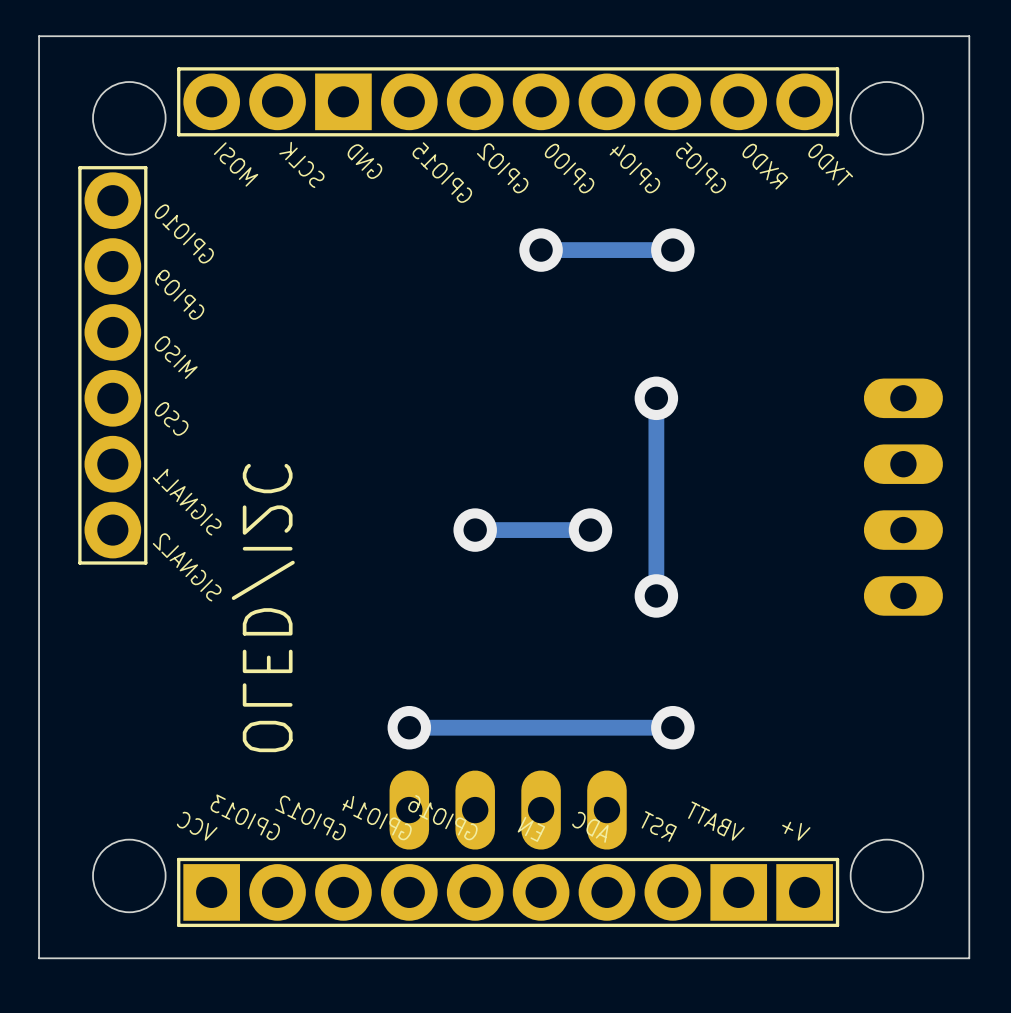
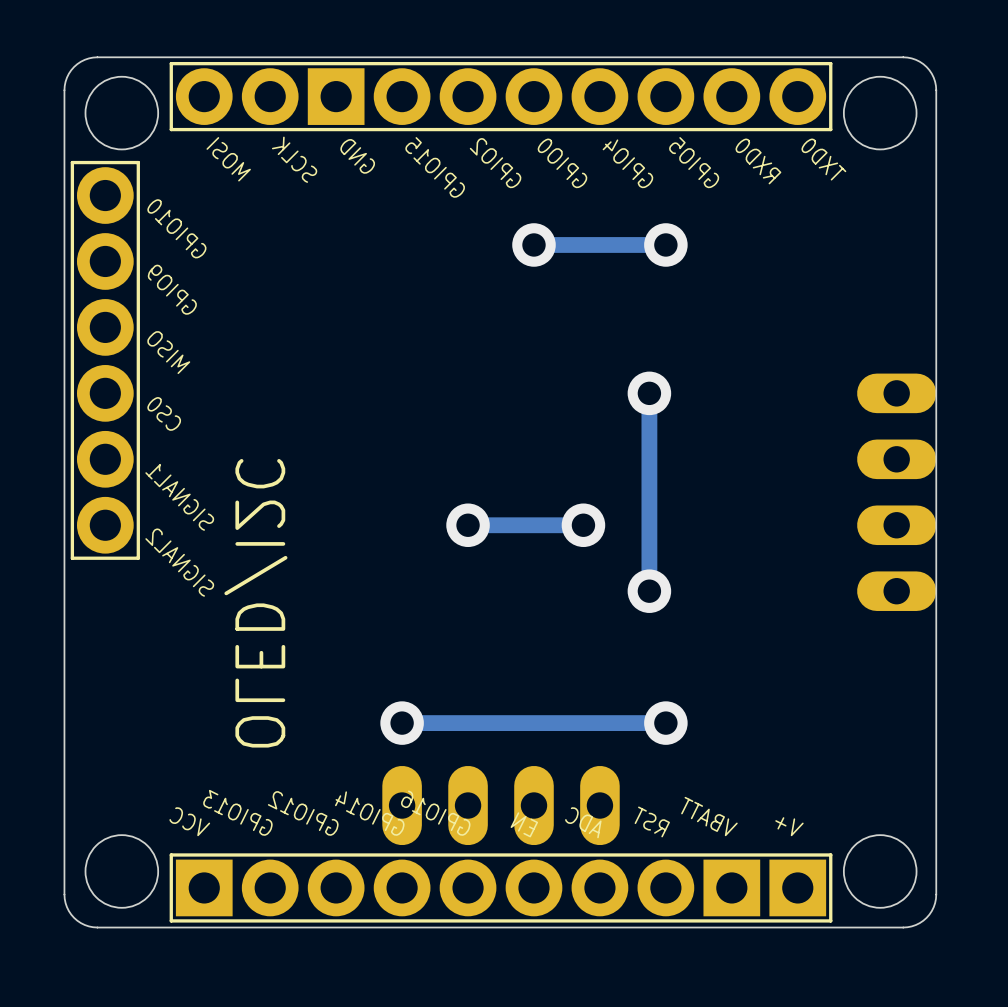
board edge: (969, 36) (39, 36) (39, 958) (969, 958) (969, 36) -> (903, 57) (915, 59) (926, 66) (933, 77) (936, 90) (936, 894) (933, 907) (926, 917) (915, 925) (903, 927) (97, 927) (84, 925) (74, 917) (66, 907) (64, 894) (64, 90) (66, 77) (74, 66) (84, 59) (97, 57) (903, 57)

